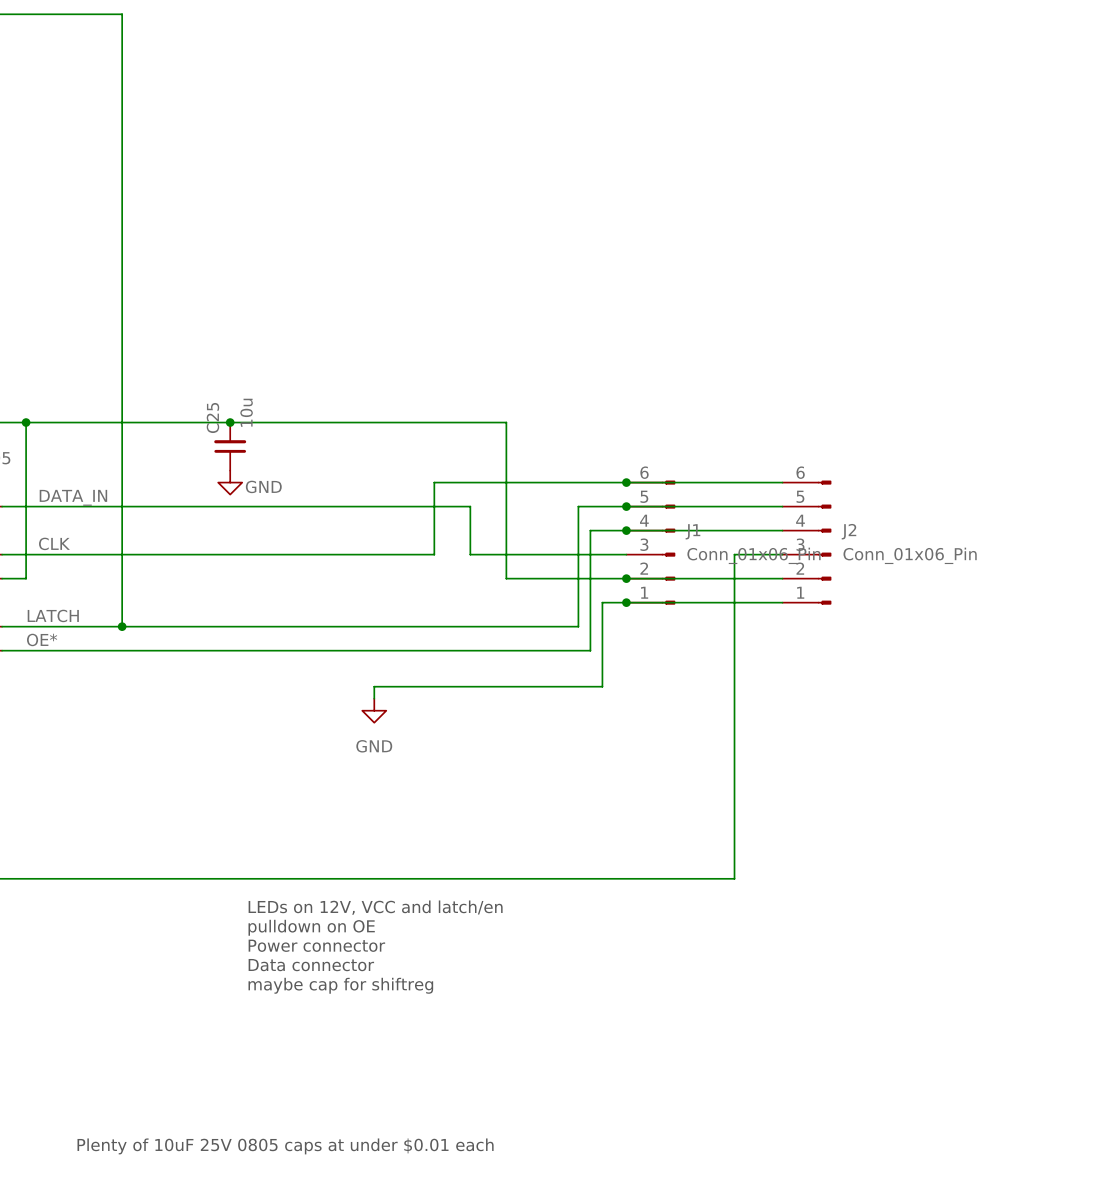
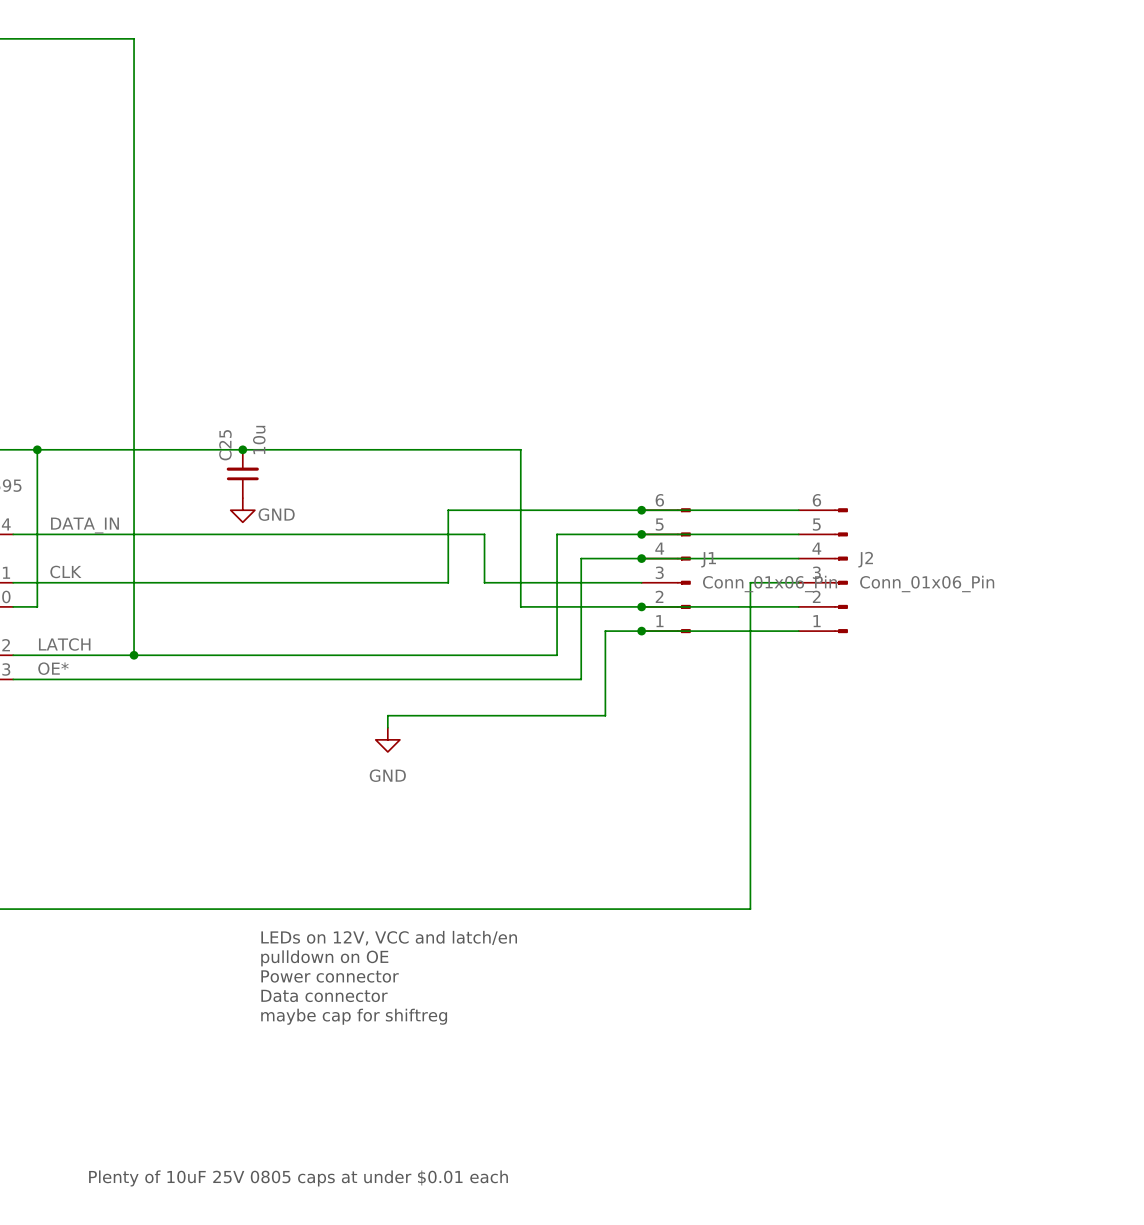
wire: (578, 506) (578, 626) (542, 626) -> (593, 534) (557, 534) (557, 655)
wire: (590, 530) (590, 602) -> (605, 558) (581, 558) (581, 679)
wire: (602, 602) (602, 686) (590, 686) -> (617, 631) (605, 631)
wire: (566, 650) (590, 650) -> (605, 715) (605, 679)

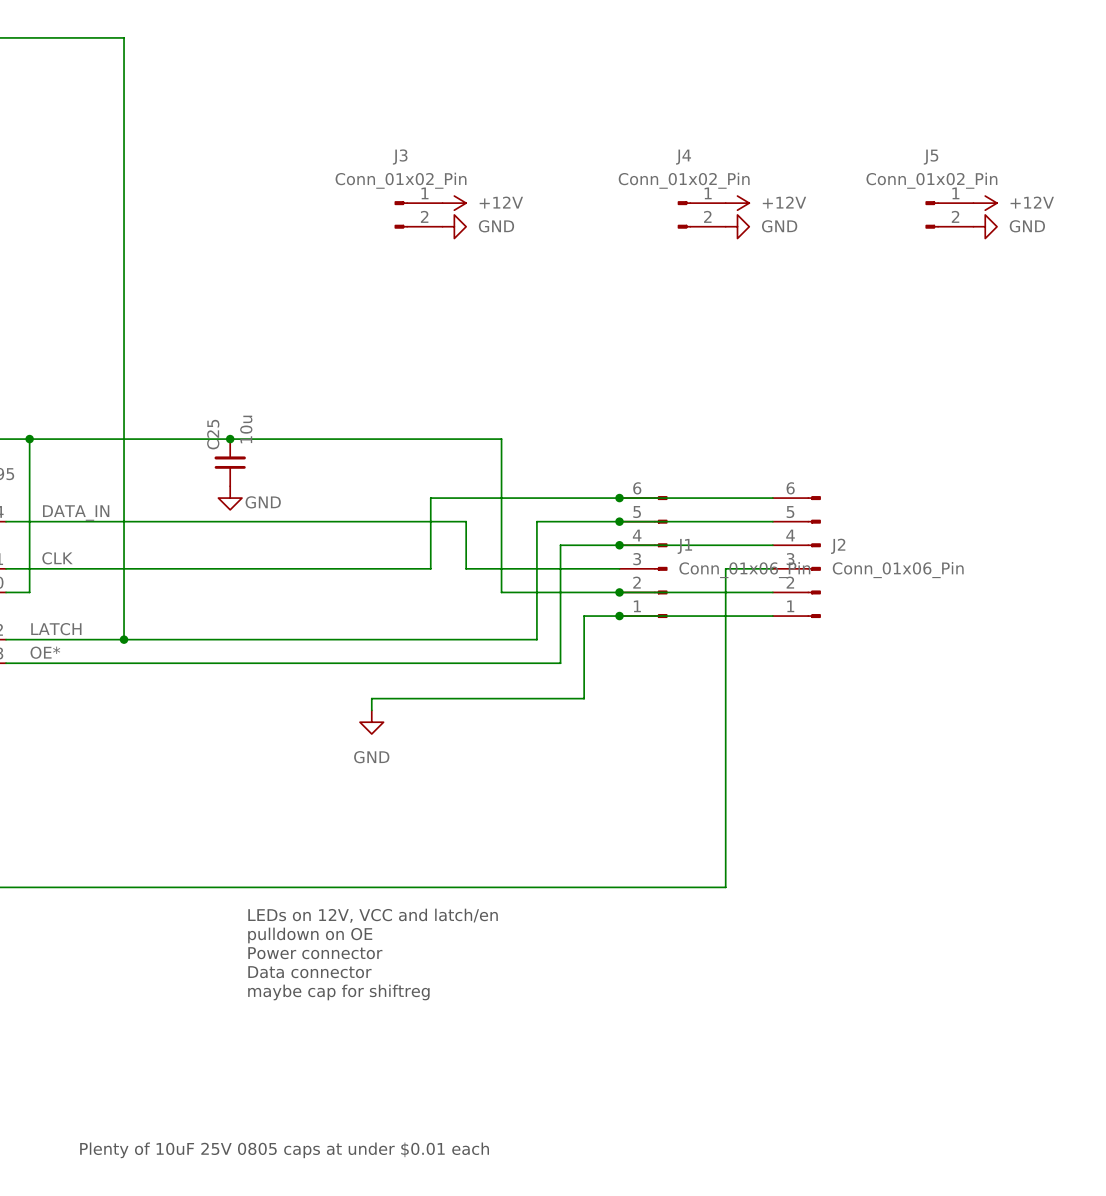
power symbol: none -> +12V (454, 203)
power symbol: none -> +12V (737, 203)
power symbol: none -> +12V (985, 203)
J3: none -> Conn_01x02_Pin (418, 214)
J4: none -> Conn_01x02_Pin (701, 214)
J5: none -> Conn_01x02_Pin (949, 214)
power symbol: none -> GND (454, 226)
power symbol: none -> GND (737, 226)
power symbol: none -> GND (985, 226)

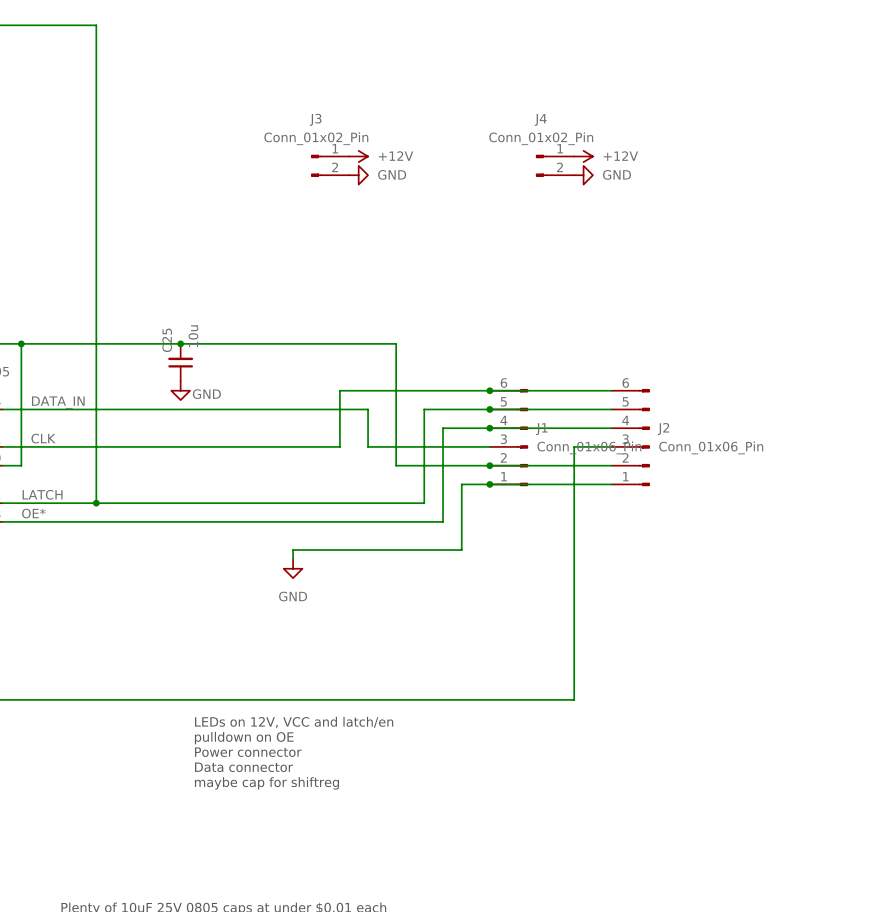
power symbol: +12V (985, 203) -> none
J5: Conn_01x02_Pin (949, 214) -> none
power symbol: GND (985, 226) -> none

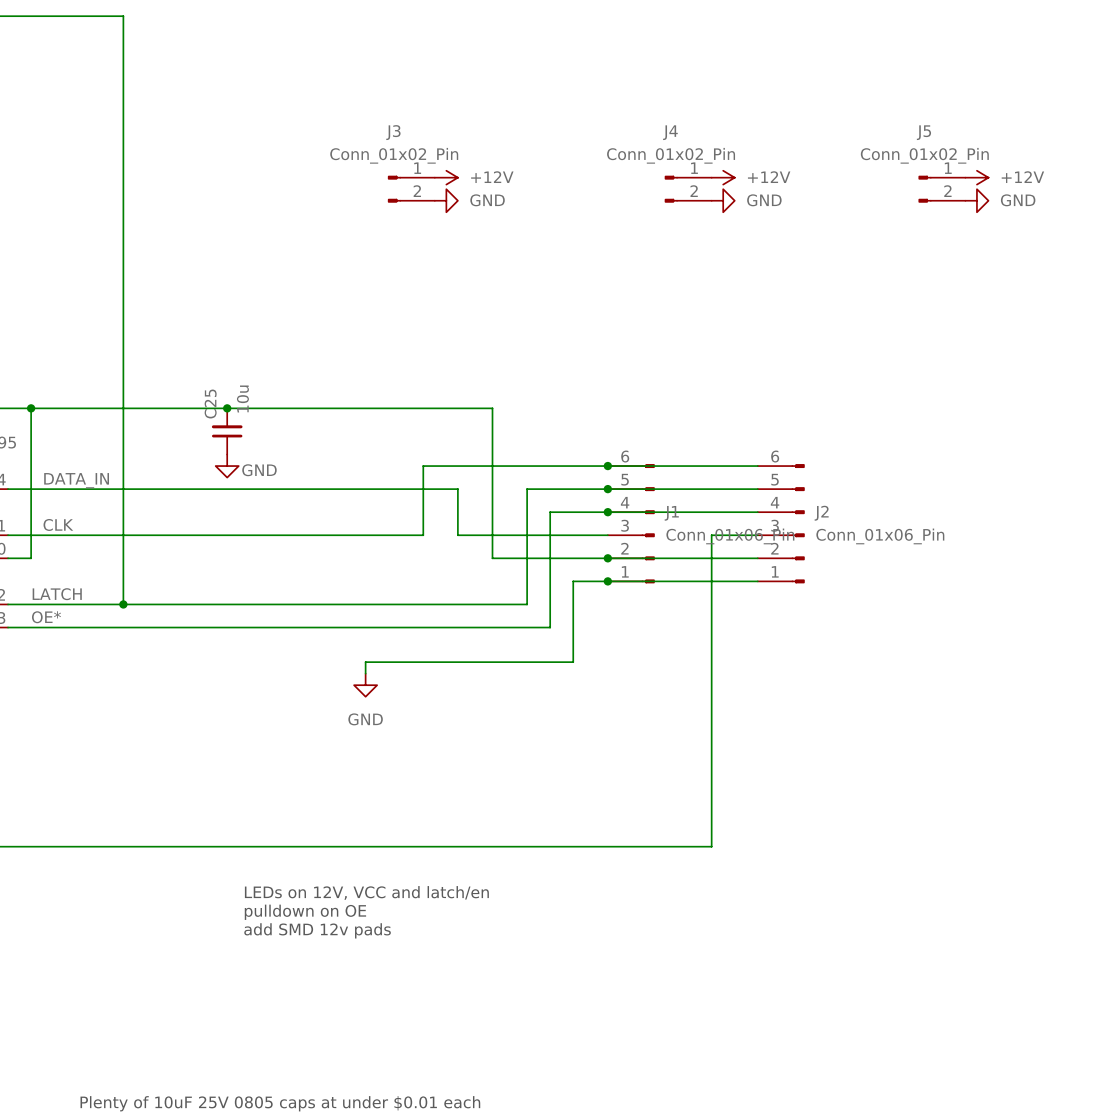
power symbol: none -> +12V (976, 177)
J5: none -> Conn_01x02_Pin (942, 189)
power symbol: none -> GND (976, 200)
text: LEDs on 12V, VCC and latch/en (294, 722) -> none
text: pulldown on OE (244, 738) -> LEDs on 12V, VCC and latch/en (366, 892)
text: Power connector (248, 752) -> pulldown on OE (305, 912)
text: Data connector (243, 767) -> add SMD 12v pads (317, 930)
text: maybe cap for shiftreg (266, 783) -> none

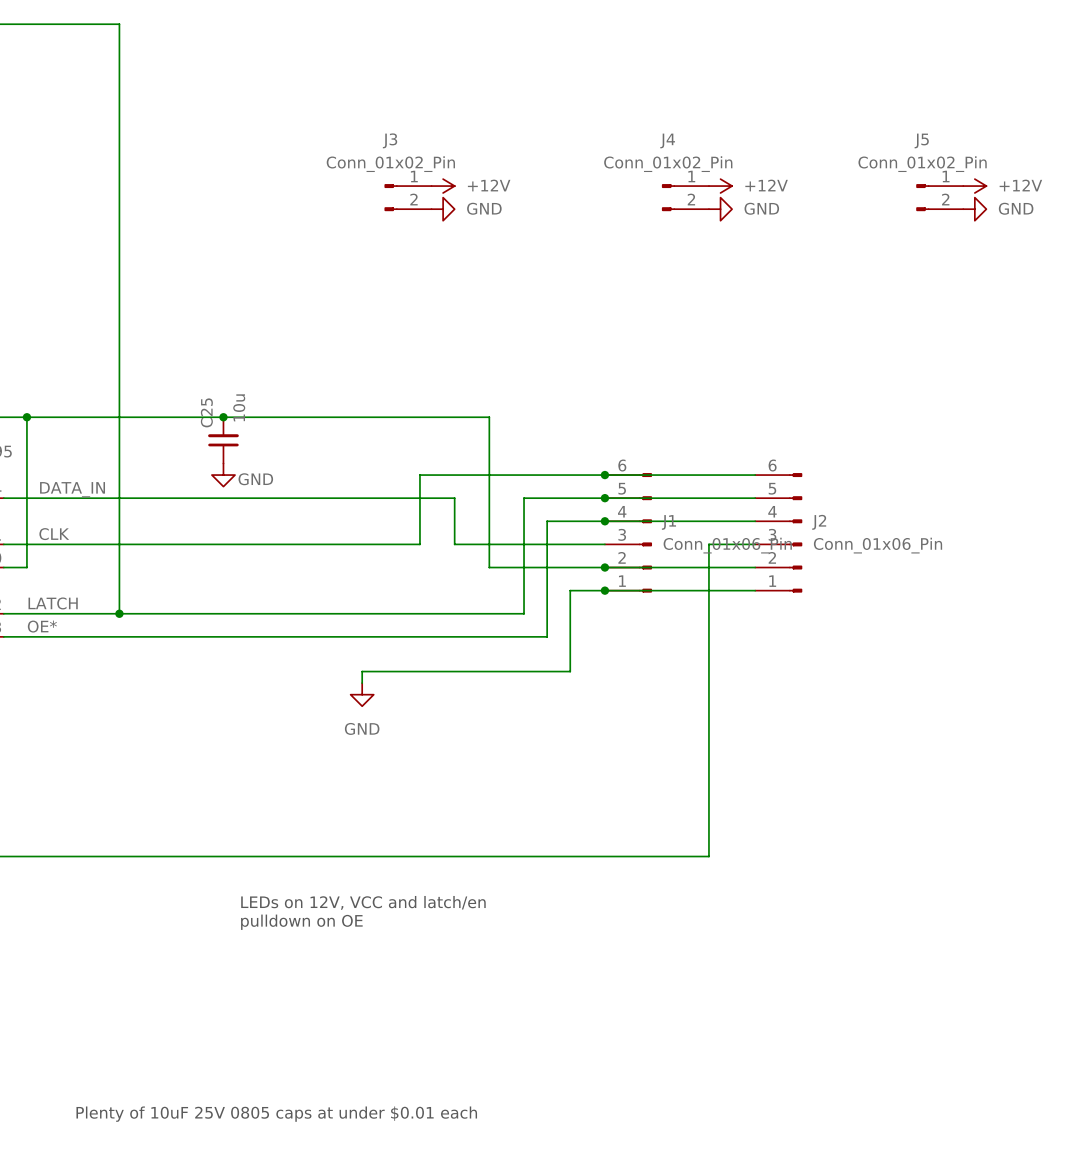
text: add SMD 12v pads (317, 930) -> none

